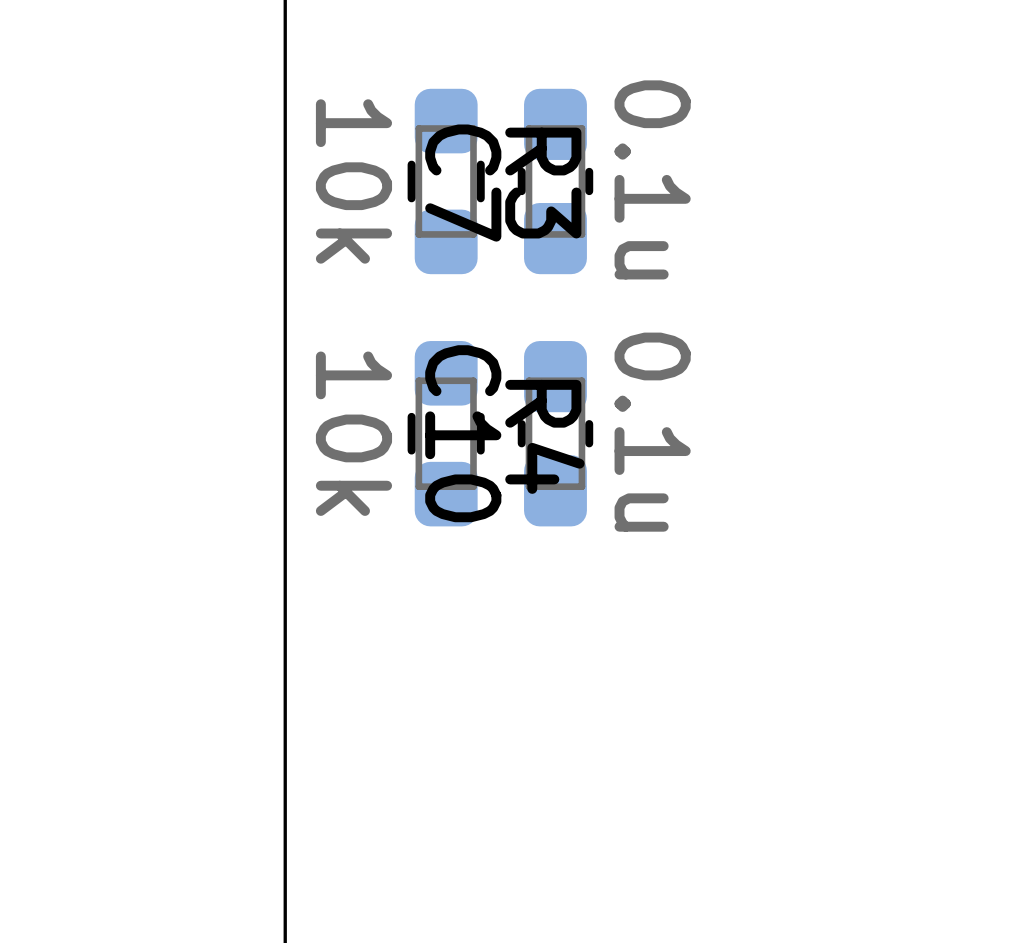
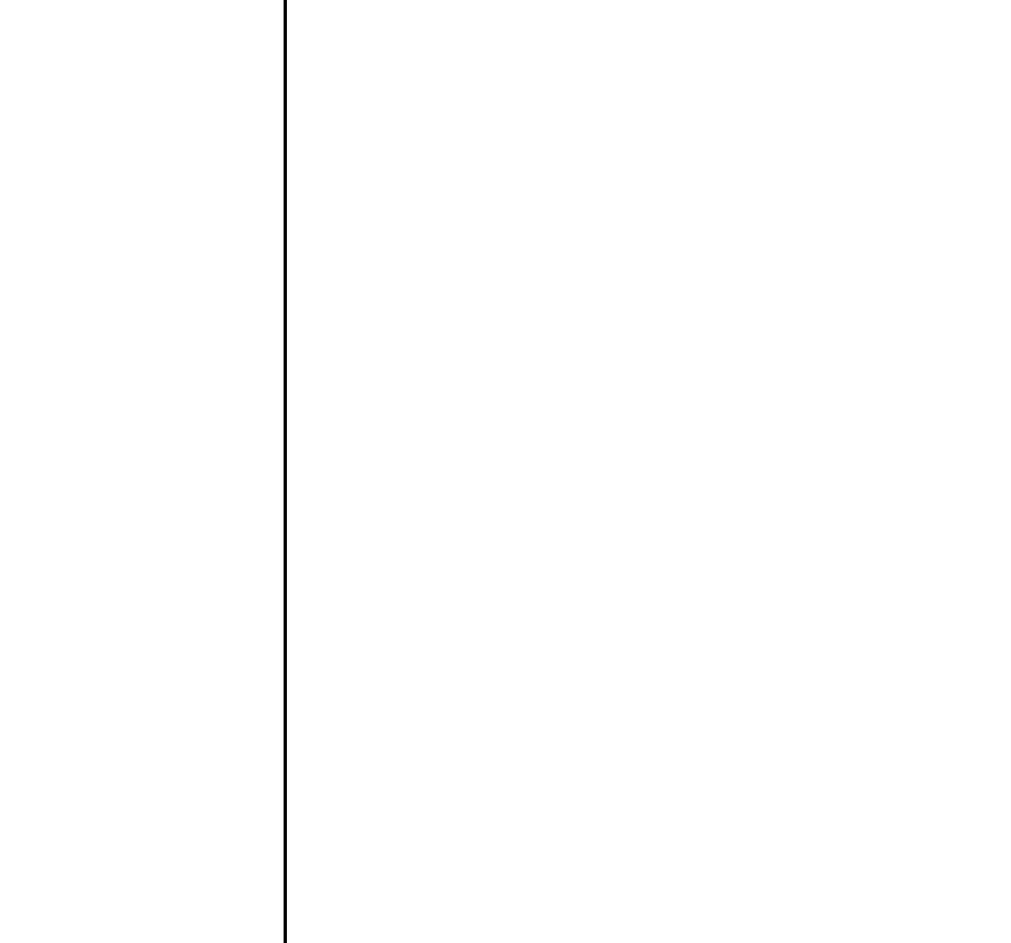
R3: 10k (446, 181) -> none
C7: 0.1u (555, 181) -> none
R4: 10k (446, 433) -> none
C10: 0.1u (555, 433) -> none

